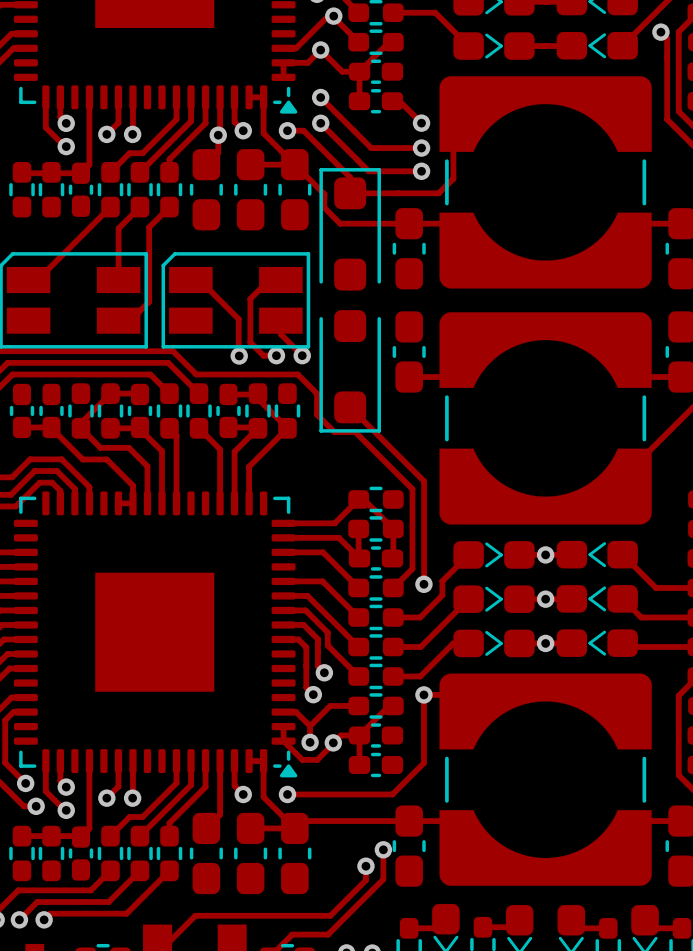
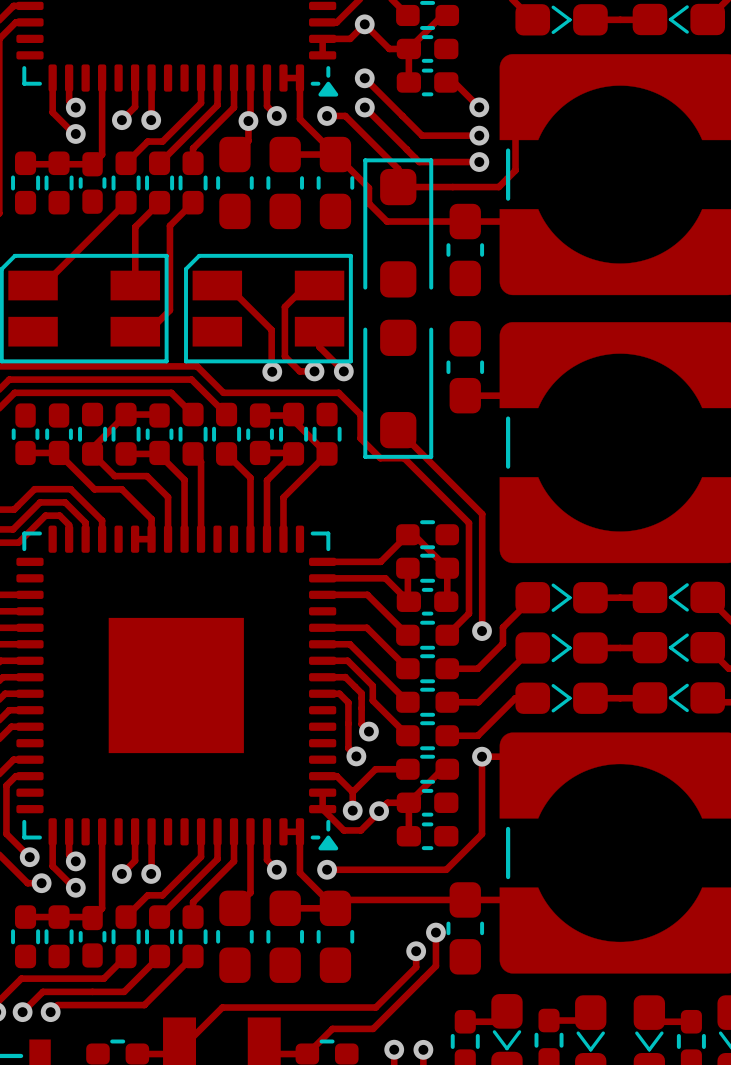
via: (545, 554) -> none
via: (545, 599) -> none
via: (545, 643) -> none

